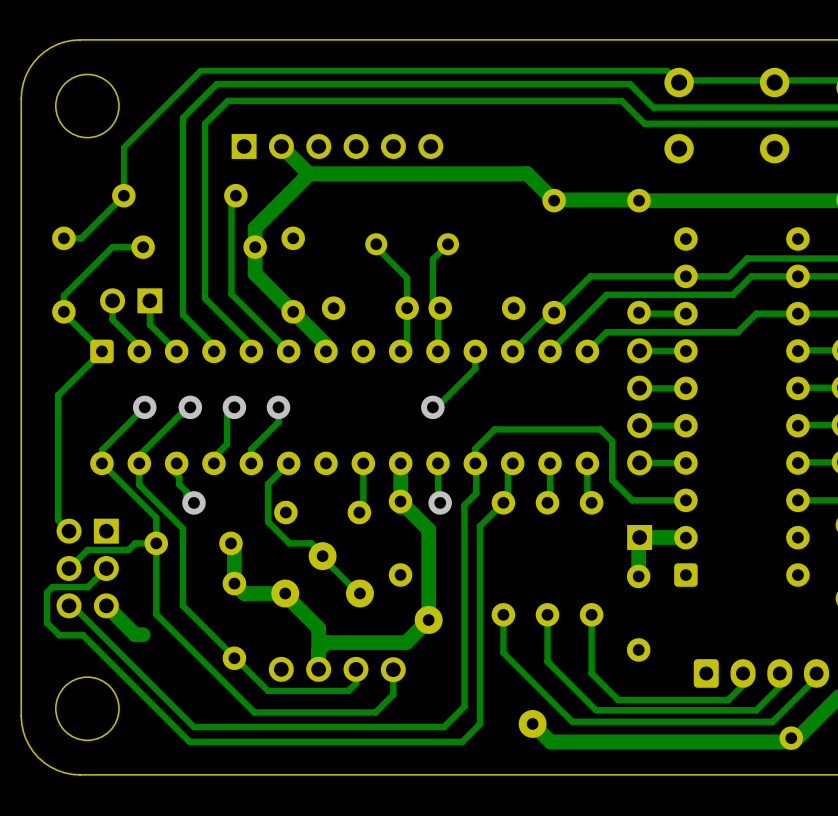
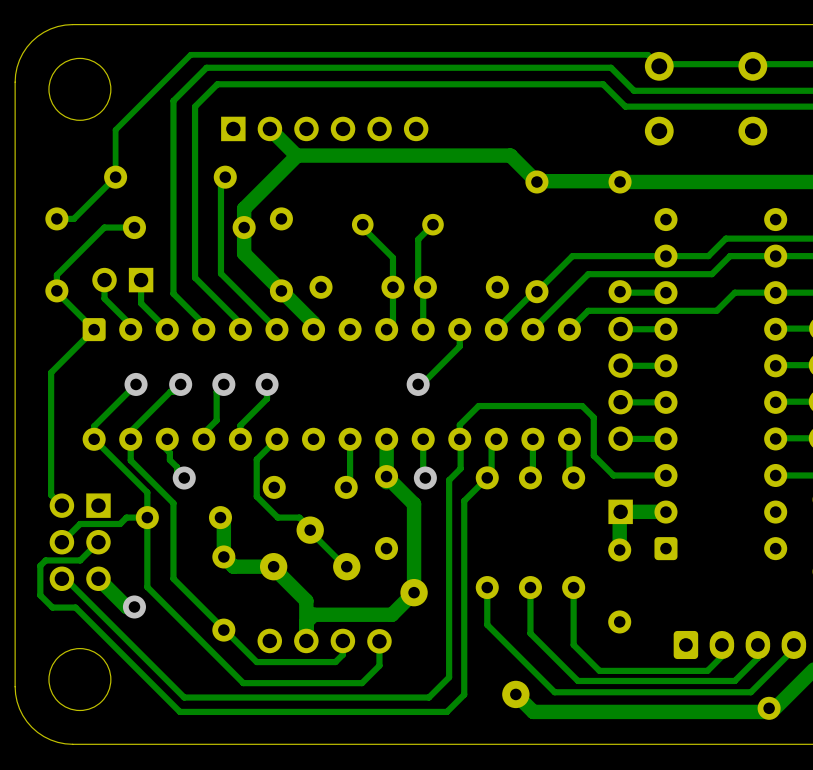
via: none -> (134, 606)

